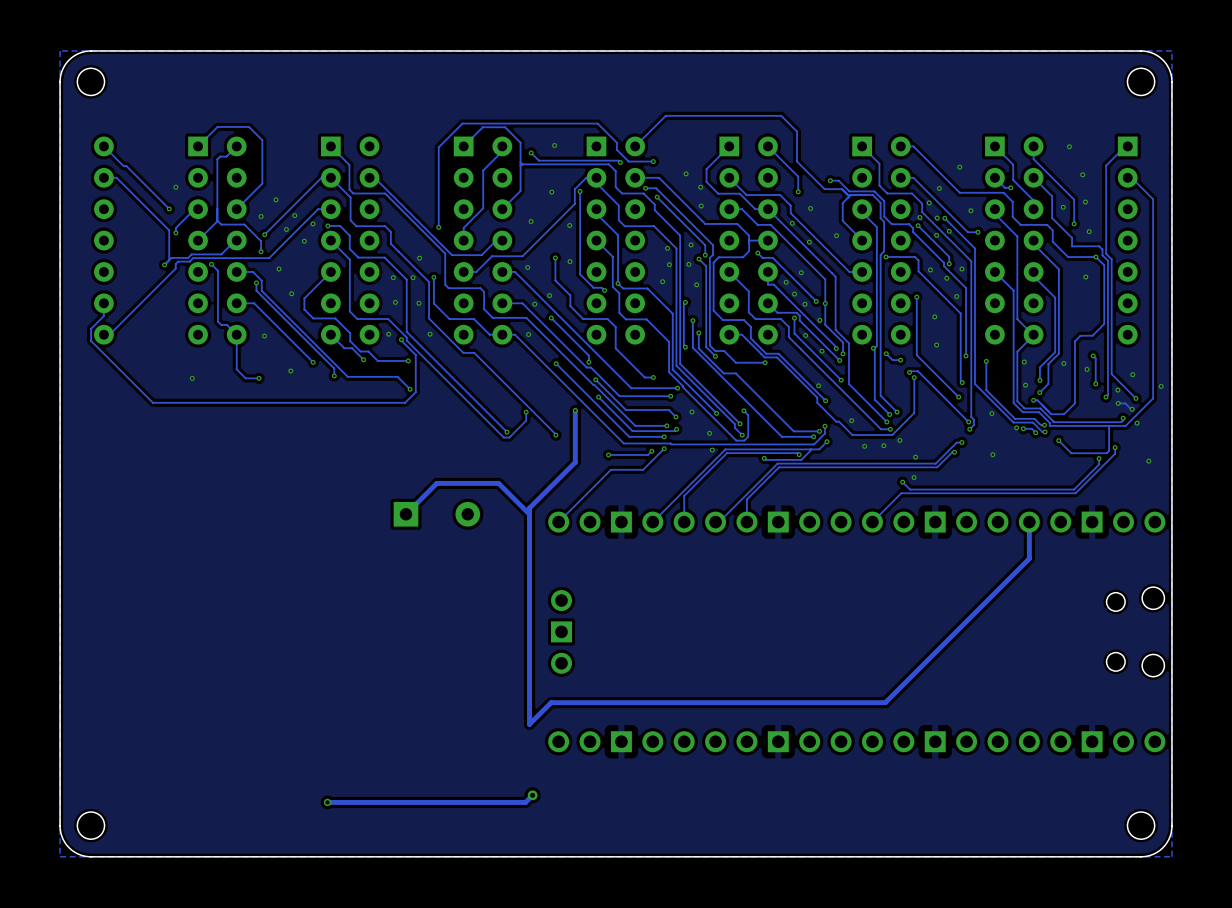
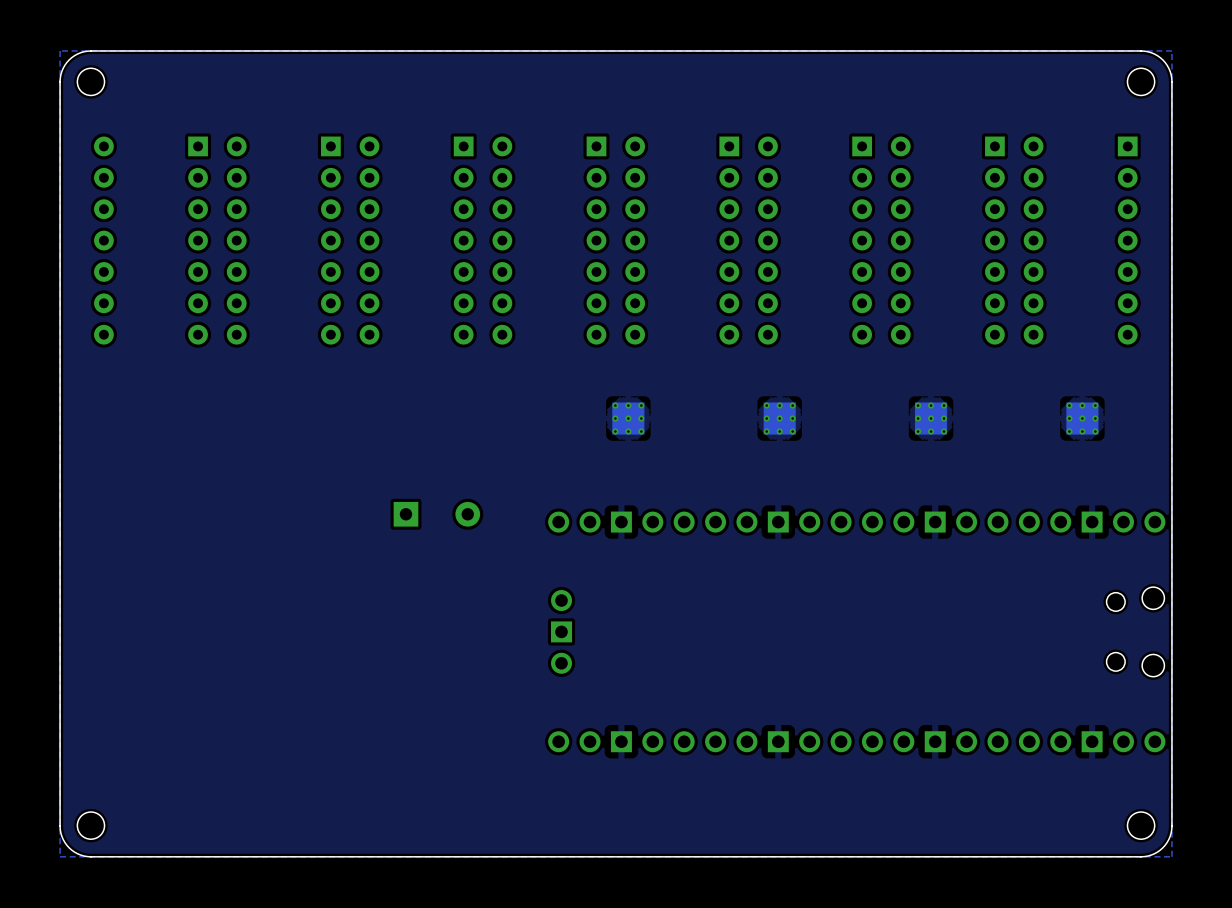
via: (554, 145) -> none
track: (103, 146) (169, 208) -> none
track: (198, 146) (217, 126) (249, 126) (262, 140) (262, 183) (236, 209) -> none
track: (236, 146) (226, 156) (220, 156) (217, 159) (217, 221) (198, 240) -> none
track: (330, 146) (349, 165) (349, 189) (353, 193) (385, 193) (445, 253) (445, 284) (448, 288) (480, 288) (484, 291) (484, 309) (492, 317) (526, 317) (635, 425) (666, 425) -> none
track: (463, 146) (482, 127) (505, 127) (520, 142) (520, 190) (502, 209) -> none
track: (502, 146) (502, 151) (483, 170) (483, 208) (463, 227) (463, 240) -> none
track: (635, 146) (665, 115) (781, 115) (797, 131) (797, 161) (824, 189) (841, 189) (849, 196) -> none
track: (729, 146) (706, 169) (706, 181) (718, 193) (739, 193) (755, 209) (767, 209) (835, 276) (835, 329) (848, 343) (848, 384) (886, 421) -> none
track: (767, 146) (798, 176) (798, 191) -> none
track: (862, 146) (879, 163) (879, 185) (887, 193) (912, 193) (922, 203) (922, 212) (971, 261) (971, 417) (973, 419) (973, 425) (969, 429) -> none
track: (900, 146) (913, 146) (959, 192) (1003, 192) (1012, 201) (1012, 216) (1020, 224) (1047, 224) (1052, 230) (1052, 241) (1068, 256) (1095, 256) (1104, 265) (1104, 324) (1092, 335) (1080, 335) (1074, 341) (1074, 403) (1064, 414) (1051, 414) (1037, 400) (1033, 400) -> none
track: (994, 146) (1013, 164) (1013, 180) (1033, 200) (1033, 209) -> none
track: (1033, 146) (1033, 159) (1074, 199) (1074, 223) -> none
via: (1069, 146) -> none
track: (1127, 146) (1125, 146) (1106, 165) (1106, 253) (1111, 259) (1111, 374) (1135, 398) -> none
track: (531, 152) (538, 160) (618, 160) (620, 162) -> none
via: (531, 152) -> none
track: (653, 161) (628, 161) (616, 149) (616, 142) (597, 123) (462, 123) (438, 147) (438, 227) -> none
via: (653, 161) -> none
via: (620, 162) -> none
track: (520, 165) (608, 164) (615, 171) (615, 187) (622, 193) (643, 193) (654, 204) (654, 210) (680, 235) (680, 363) (740, 423) -> none
via: (959, 167) -> none
via: (686, 173) -> none
via: (1082, 174) -> none
track: (103, 177) (116, 177) (169, 230) (169, 260) (164, 264) (171, 257) (188, 257) (191, 254) (221, 254) (236, 240) -> none
track: (369, 177) (374, 177) (452, 255) (481, 255) (496, 240) (502, 240) -> none
track: (591, 177) (618, 205) (618, 220) (624, 226) (654, 226) (676, 248) (676, 365) (734, 424) (734, 427) (742, 435) -> none
track: (596, 177) (586, 177) (574, 189) (574, 203) (522, 256) (492, 256) (476, 271) (463, 271) -> none
track: (635, 177) (659, 177) (705, 223) (737, 223) (749, 235) (749, 251) (742, 257) (718, 257) (713, 262) (713, 310) (722, 320) (743, 320) (750, 326) (750, 338) (766, 353) (778, 353) (825, 400) -> none
track: (729, 177) (746, 195) (780, 195) (790, 205) (790, 213) (849, 271) (862, 271) -> none
track: (900, 177) (913, 177) (967, 232) (978, 232) -> none
track: (994, 177) (1004, 187) (1010, 187) -> none
track: (1033, 177) (1052, 196) (1052, 218) (1072, 237) (1072, 246) (1099, 246) (1102, 249) (1102, 255) (1107, 260) (1107, 395) (1105, 397) -> none
track: (1127, 177) (1131, 177) (1153, 199) (1153, 398) (1125, 425) (1049, 425) (1049, 423) (1038, 412) (1022, 412) (1013, 403) (1013, 290) (994, 271) -> none
track: (830, 180) (838, 180) (849, 191) (874, 191) (884, 201) (884, 216) (891, 224) (909, 224) (913, 228) (913, 231) (966, 288) (966, 355) -> none
via: (830, 180) -> none
via: (175, 187) -> none
via: (700, 187) -> none
via: (1010, 187) -> none
track: (645, 188) (656, 188) (713, 245) (713, 254) (709, 257) (709, 345) (715, 351) (724, 351) (735, 362) (765, 362) -> none
via: (645, 188) -> none
via: (939, 188) -> none
track: (580, 191) (580, 274) (593, 287) (601, 287) (604, 290) -> none
via: (580, 191) -> none
via: (798, 191) -> none
via: (551, 192) -> none
track: (847, 195) (872, 195) (880, 202) (880, 218) (884, 221) (884, 251) (880, 254) (880, 395) (897, 412) -> none
track: (850, 195) (842, 203) (842, 220) (862, 240) -> none
track: (657, 197) (705, 245) (705, 255) -> none
via: (657, 197) -> none
via: (275, 199) -> none
via: (929, 202) -> none
via: (1085, 202) -> none
via: (701, 206) -> none
via: (1063, 207) -> none
via: (169, 208) -> none
via: (810, 208) -> none
track: (198, 209) (194, 209) (175, 227) (175, 232) -> none
track: (330, 209) (318, 209) (269, 258) (193, 258) (189, 261) (178, 261) (175, 268) (109, 334) (103, 334) -> none
track: (596, 209) (596, 213) (618, 235) (618, 283) (623, 288) (647, 288) (672, 313) (672, 369) (716, 413) -> none
track: (729, 209) (741, 209) (757, 224) (770, 224) (825, 279) (825, 324) (843, 342) (843, 353) -> none
track: (862, 209) (862, 212) (876, 227) (876, 346) (874, 348) -> none
track: (994, 209) (994, 214) (1017, 236) (1017, 319) (1033, 335) -> none
via: (970, 210) -> none
via: (294, 215) -> none
via: (261, 216) -> none
via: (919, 217) -> none
via: (937, 218) -> none
track: (944, 218) (975, 248) (975, 384) (1013, 422) (1032, 422) (1042, 432) (1045, 432) -> none
via: (944, 218) -> none
track: (217, 220) (221, 224) (244, 224) (261, 241) (261, 251) -> none
via: (531, 221) -> none
via: (313, 223) -> none
via: (792, 223) -> none
via: (1074, 223) -> none
track: (327, 225) (340, 225) (349, 235) (349, 248) (358, 257) (384, 257) (406, 279) (406, 331) (506, 432) -> none
via: (327, 225) -> none
via: (569, 225) -> none
track: (918, 225) (949, 256) (949, 263) -> none
via: (918, 225) -> none
via: (438, 227) -> none
via: (286, 229) -> none
via: (949, 231) -> none
via: (1089, 231) -> none
via: (175, 232) -> none
via: (978, 232) -> none
track: (264, 234) (321, 177) (330, 177) (350, 197) (350, 220) (356, 226) (385, 226) (390, 231) (390, 243) (429, 281) (429, 318) (463, 352) (474, 352) (555, 435) -> none
via: (264, 234) -> none
via: (836, 235) -> none
via: (936, 235) -> none
track: (330, 240) (349, 259) (349, 311) (357, 319) (388, 319) (406, 337) (406, 340) (503, 437) (509, 437) (526, 420) (526, 412) -> none
track: (596, 240) (612, 256) (612, 286) (619, 293) (619, 312) (625, 319) (646, 319) (669, 341) (669, 372) (736, 440) (744, 440) (748, 436) (748, 415) (743, 410) -> none
track: (767, 240) (749, 240) -> none
track: (1033, 240) (1033, 244) (1058, 269) (1058, 353) (1048, 364) (1048, 383) (1039, 392) -> none
via: (304, 241) -> none
via: (809, 242) -> none
via: (691, 244) -> none
via: (667, 248) -> none
via: (261, 251) -> none
track: (757, 253) (762, 257) (772, 257) (816, 301) -> none
via: (757, 253) -> none
via: (705, 255) -> none
track: (885, 256) (914, 256) (918, 260) (918, 271) (960, 313) (962, 382) -> none
via: (885, 256) -> none
via: (1095, 256) -> none
track: (555, 257) (555, 280) (570, 295) (570, 306) (583, 319) (607, 319) (615, 327) (615, 348) (644, 377) (653, 377) -> none
via: (555, 257) -> none
via: (419, 258) -> none
track: (699, 259) (706, 266) (706, 347) (715, 356) -> none
via: (699, 259) -> none
via: (569, 261) -> none
via: (949, 263) -> none
via: (164, 264) -> none
track: (211, 264) (217, 270) (217, 321) (221, 324) (226, 324) (236, 334) (236, 369) (245, 378) (258, 378) -> none
via: (211, 264) -> none
via: (669, 264) -> none
via: (688, 264) -> none
via: (527, 267) -> none
via: (279, 269) -> none
via: (930, 269) -> none
via: (961, 269) -> none
track: (236, 271) (253, 271) (261, 280) (261, 290) (347, 376) (397, 376) (410, 389) -> none
track: (330, 271) (304, 298) (304, 309) (313, 318) (335, 318) (350, 333) (350, 341) (360, 351) (368, 351) (377, 360) (408, 360) -> none
track: (502, 271) (515, 271) (631, 388) (677, 388) -> none
track: (729, 271) (748, 291) (748, 312) (755, 319) (780, 319) (788, 327) (788, 337) (881, 429) (890, 429) -> none
track: (767, 271) (767, 284) (773, 284) (836, 348) -> none
track: (1033, 271) (1033, 276) (1055, 297) (1055, 352) (1039, 367) (1039, 380) -> none
via: (801, 272) -> none
via: (393, 277) -> none
via: (413, 277) -> none
track: (433, 277) (433, 303) (449, 319) (474, 319) (489, 334) (515, 334) (623, 443) (814, 444) (824, 433) (824, 426) -> none
via: (433, 277) -> none
via: (1085, 277) -> none
via: (946, 278) -> none
via: (662, 281) -> none
track: (256, 282) (256, 290) (334, 368) (334, 375) -> none
via: (256, 282) -> none
via: (786, 282) -> none
via: (618, 283) -> none
via: (696, 284) -> none
via: (604, 290) -> none
via: (291, 293) -> none
via: (794, 294) -> none
via: (549, 295) -> none
via: (956, 296) -> none
track: (916, 297) (916, 355) (958, 397) -> none
via: (916, 297) -> none
via: (816, 301) -> none
via: (395, 302) -> none
track: (685, 302) (683, 303) (685, 347) -> none
via: (685, 302) -> none
track: (103, 303) (103, 316) (91, 328) (91, 340) (152, 402) (405, 402) (415, 392) (415, 355) (401, 339) -> none
track: (236, 303) (254, 303) (313, 362) -> none
via: (418, 303) -> none
track: (502, 303) (522, 303) (586, 367) (590, 367) (619, 396) (670, 396) -> none
track: (767, 303) (777, 312) (796, 312) (799, 315) (799, 320) (839, 360) -> none
via: (825, 303) -> none
via: (534, 304) -> none
via: (805, 304) -> none
via: (934, 316) -> none
track: (551, 318) (588, 355) (588, 362) -> none
via: (551, 318) -> none
track: (794, 318) (794, 333) (841, 380) -> none
via: (794, 318) -> none
track: (692, 320) (692, 347) (781, 436) (813, 436) -> none
via: (692, 320) -> none
via: (819, 320) -> none
track: (698, 332) (698, 348) (723, 373) (735, 373) (793, 431) (819, 431) -> none
via: (698, 332) -> none
track: (330, 334) (344, 348) (352, 348) (363, 359) -> none
via: (388, 334) -> none
via: (430, 334) -> none
via: (528, 334) -> none
track: (729, 334) (741, 334) (764, 357) (777, 357) (817, 397) (817, 402) (852, 434) (892, 434) (914, 413) (914, 377) -> none
via: (805, 335) -> none
track: (1033, 335) (1017, 351) (1017, 401) (1024, 408) (1040, 408) (1053, 422) (1121, 422) (1123, 418) -> none
via: (264, 336) -> none
via: (401, 339) -> none
via: (936, 345) -> none
via: (685, 347) -> none
via: (836, 348) -> none
via: (873, 348) -> none
track: (874, 348) (874, 399) (889, 414) -> none
via: (822, 351) -> none
via: (843, 353) -> none
track: (886, 353) (892, 360) (900, 360) -> none
via: (886, 353) -> none
via: (966, 355) -> none
track: (1093, 355) (1095, 358) (1095, 383) -> none
via: (1093, 355) -> none
via: (715, 356) -> none
via: (363, 359) -> none
via: (408, 360) -> none
via: (839, 360) -> none
via: (900, 360) -> none
track: (986, 361) (986, 390) (1015, 418) (1034, 418) (1040, 425) (1044, 425) -> none
via: (986, 361) -> none
via: (313, 362) -> none
via: (588, 362) -> none
via: (765, 362) -> none
via: (1024, 362) -> none
track: (556, 363) (629, 436) (664, 436) -> none
via: (556, 363) -> none
via: (1063, 363) -> none
via: (1087, 369) -> none
via: (290, 370) -> none
track: (909, 372) (917, 371) (968, 422) -> none
via: (909, 372) -> none
via: (1132, 374) -> none
via: (334, 375) -> none
via: (653, 377) -> none
via: (914, 377) -> none
via: (192, 378) -> none
via: (258, 378) -> none
track: (595, 379) (625, 409) (668, 409) (675, 416) -> none
via: (595, 379) -> none
via: (841, 380) -> none
via: (1039, 380) -> none
via: (962, 382) -> none
via: (1095, 383) -> none
via: (818, 385) -> none
via: (1025, 385) -> none
via: (1161, 386) -> none
via: (677, 388) -> none
via: (410, 389) -> none
via: (1117, 390) -> none
via: (1039, 392) -> none
via: (670, 396) -> none
track: (598, 397) (632, 431) (674, 431) (676, 429) -> none
via: (598, 397) -> none
via: (958, 397) -> none
via: (1105, 397) -> none
via: (1135, 398) -> none
via: (825, 400) -> none
via: (1033, 400) -> none
track: (1118, 403) (1125, 403) (1132, 409) -> none
via: (1118, 403) -> none
via: (1132, 409) -> none
track: (575, 410) (575, 462) (529, 508) (529, 724) (551, 702) (885, 702) (1029, 558) (1029, 522) -> none
via: (575, 410) -> none
via: (743, 410) -> none
via: (526, 412) -> none
via: (691, 412) -> none
via: (897, 412) -> none
via: (716, 413) -> none
via: (991, 413) -> none
via: (889, 414) -> none
via: (675, 416) -> none
part: none -> (628, 418)
part: none -> (779, 418)
part: none -> (931, 418)
part: none -> (1082, 418)
via: (1123, 418) -> none
via: (851, 420) -> none
via: (886, 421) -> none
via: (968, 422) -> none
via: (740, 423) -> none
via: (1137, 423) -> none
via: (666, 425) -> none
via: (1044, 425) -> none
track: (1109, 425) (1109, 450) (1106, 453) (1071, 453) (1058, 440) -> none
via: (824, 426) -> none
via: (1016, 427) -> none
track: (1023, 428) (1031, 428) (1035, 432) -> none
via: (1023, 428) -> none
via: (676, 429) -> none
via: (890, 429) -> none
via: (969, 429) -> none
via: (819, 431) -> none
via: (506, 432) -> none
via: (1035, 432) -> none
via: (1045, 432) -> none
via: (709, 433) -> none
via: (555, 435) -> none
via: (742, 435) -> none
via: (664, 436) -> none
via: (813, 436) -> none
via: (899, 440) -> none
via: (1058, 440) -> none
track: (826, 441) (819, 449) (725, 449) (652, 522) -> none
via: (826, 441) -> none
track: (961, 442) (956, 442) (935, 463) (777, 463) (719, 522) (715, 522) -> none
via: (961, 442) -> none
via: (883, 445) -> none
via: (864, 446) -> none
track: (1115, 447) (1115, 453) (1075, 493) (901, 493) (872, 522) -> none
via: (1115, 447) -> none
track: (664, 448) (643, 469) (610, 469) (558, 522) -> none
via: (664, 448) -> none
track: (811, 449) (801, 459) (764, 458) -> none
via: (712, 450) -> none
track: (651, 451) (648, 454) (608, 454) -> none
via: (651, 451) -> none
track: (954, 452) (937, 467) (779, 467) (746, 499) (746, 522) -> none
via: (954, 452) -> none
via: (608, 454) -> none
track: (799, 454) (797, 453) (726, 453) (684, 495) (684, 522) -> none
via: (799, 454) -> none
via: (992, 454) -> none
via: (915, 457) -> none
via: (764, 458) -> none
track: (1099, 458) (1099, 464) (1074, 489) (910, 489) (902, 482) -> none
via: (1099, 458) -> none
via: (1148, 461) -> none
via: (914, 477) -> none
via: (902, 482) -> none
track: (529, 514) (498, 483) (436, 483) (405, 514) -> none
track: (532, 795) (525, 802) (327, 802) -> none
via: (532, 795) -> none
via: (327, 802) -> none

